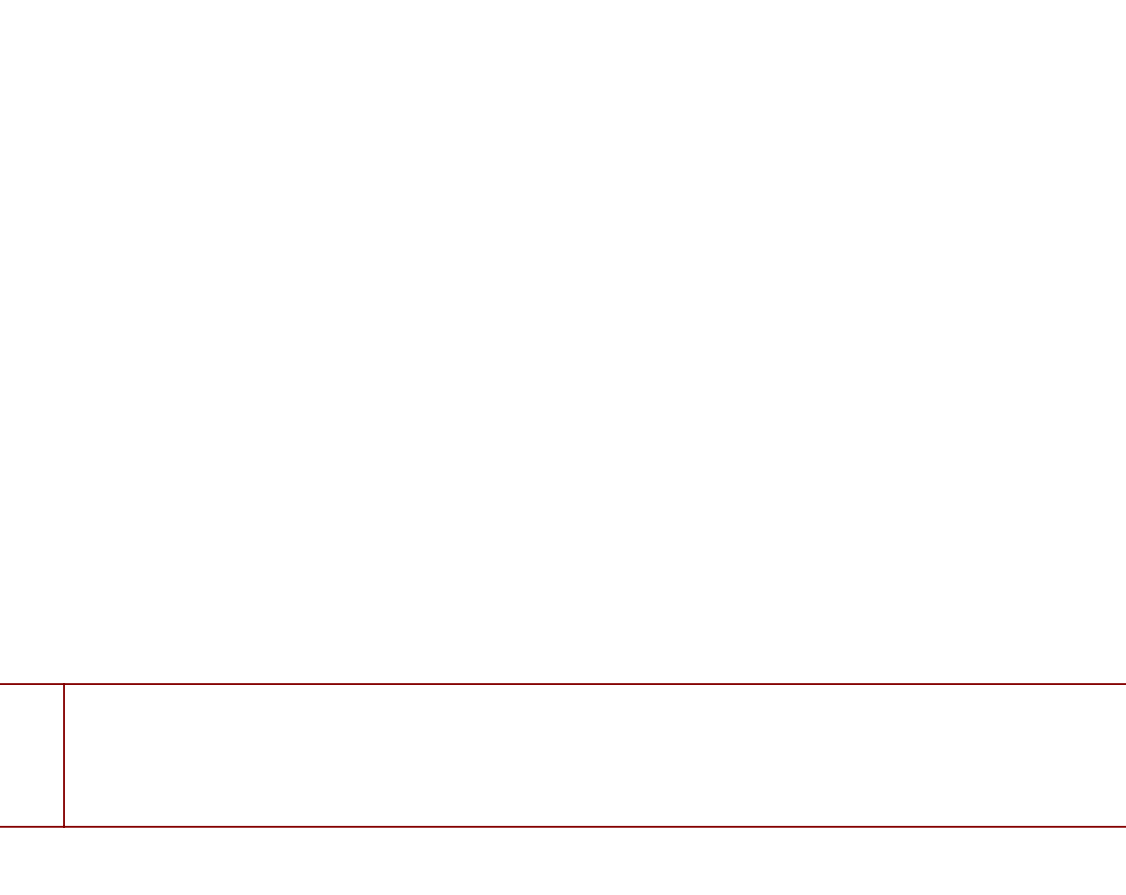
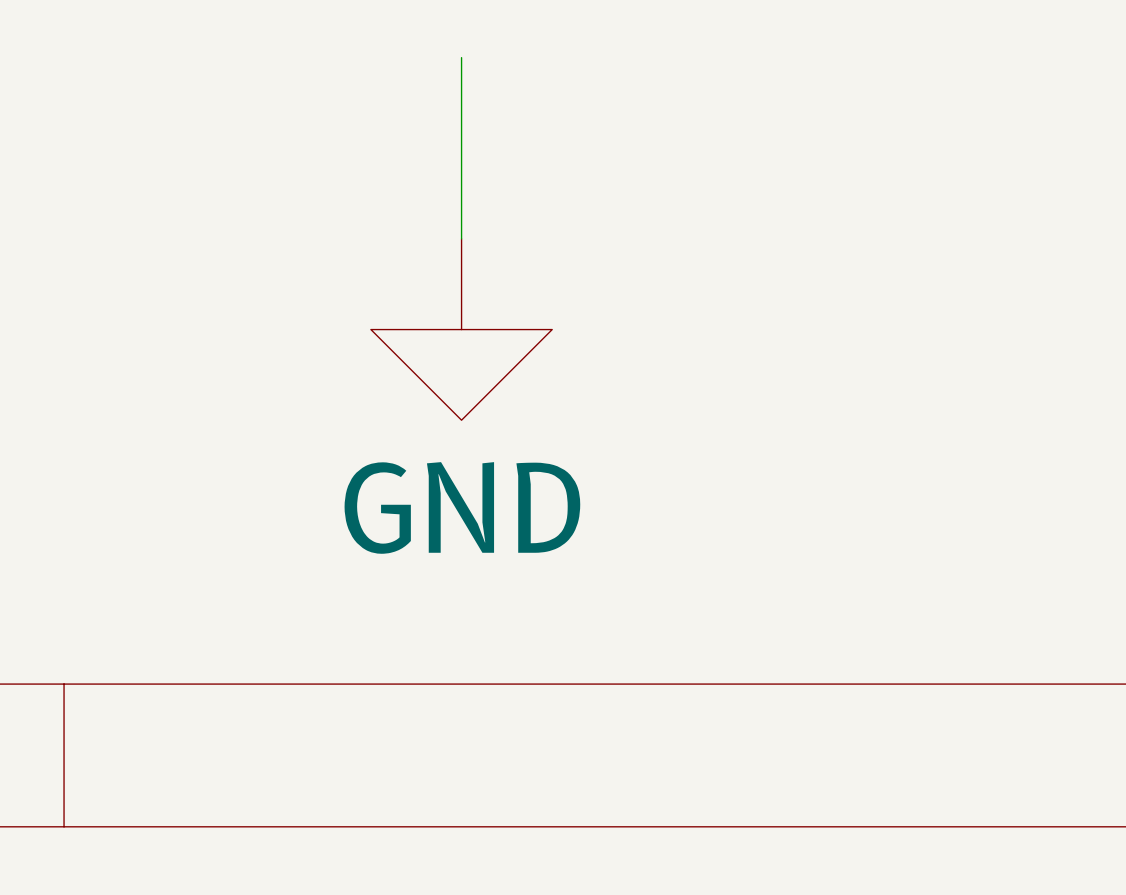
wire: none -> (461, 57) (461, 238)
power symbol: none -> GND (461, 329)

